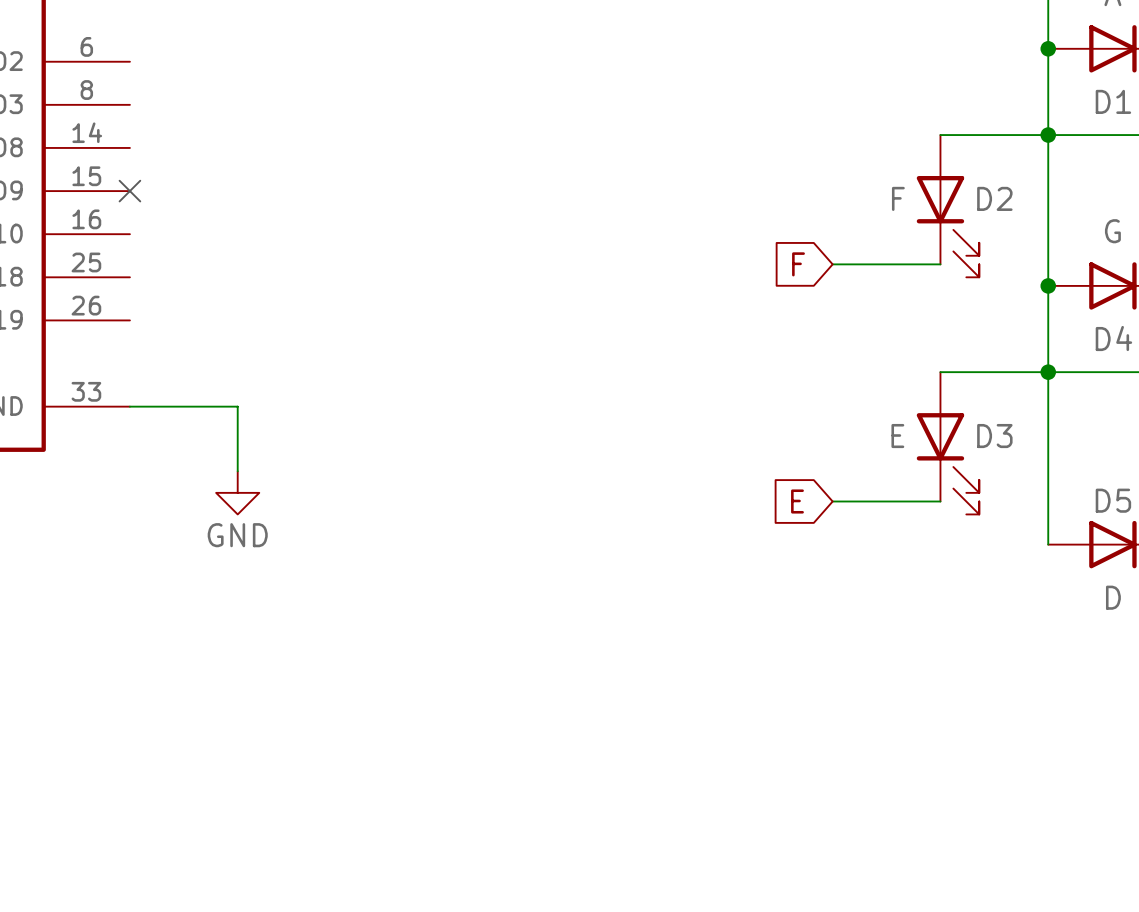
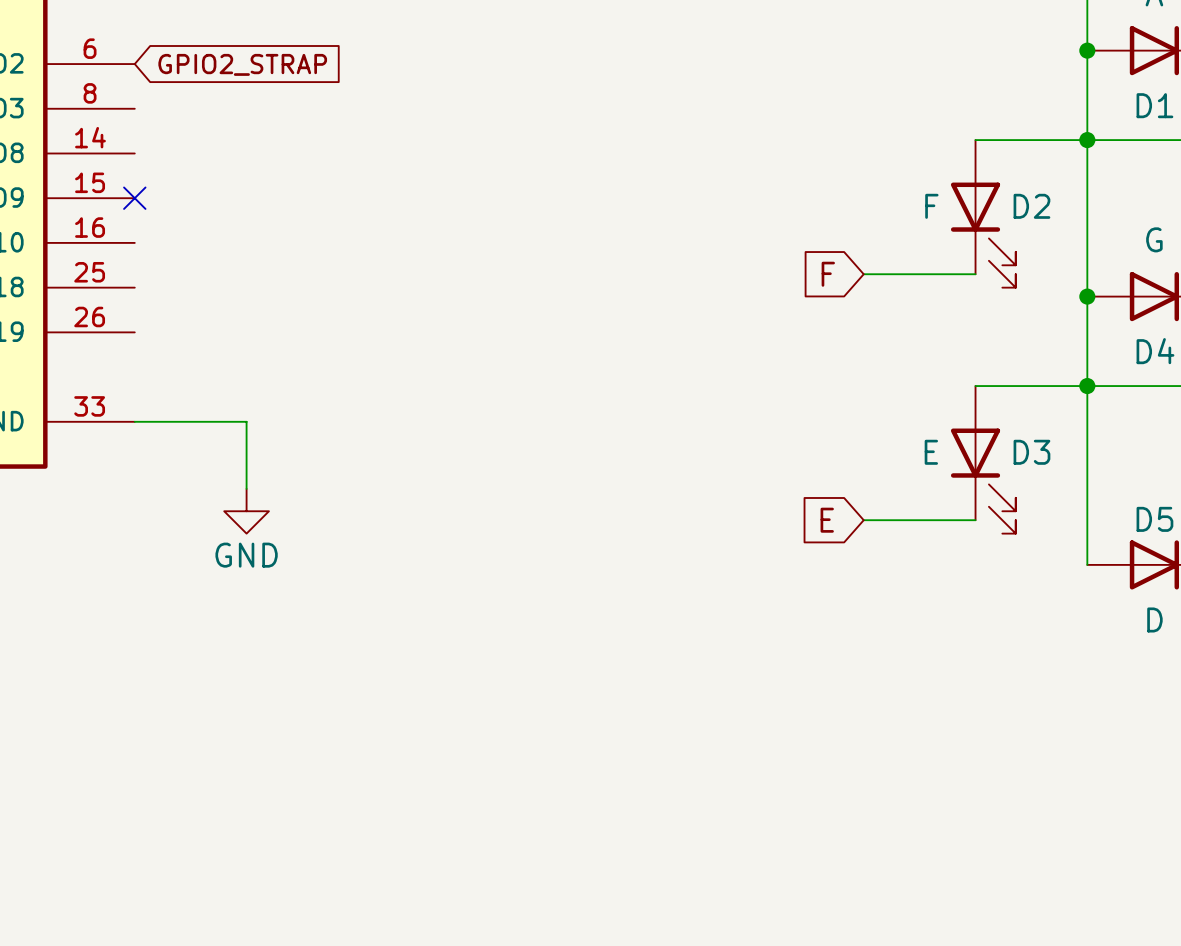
global label: none -> GPIO2_STRAP (242, 64)

